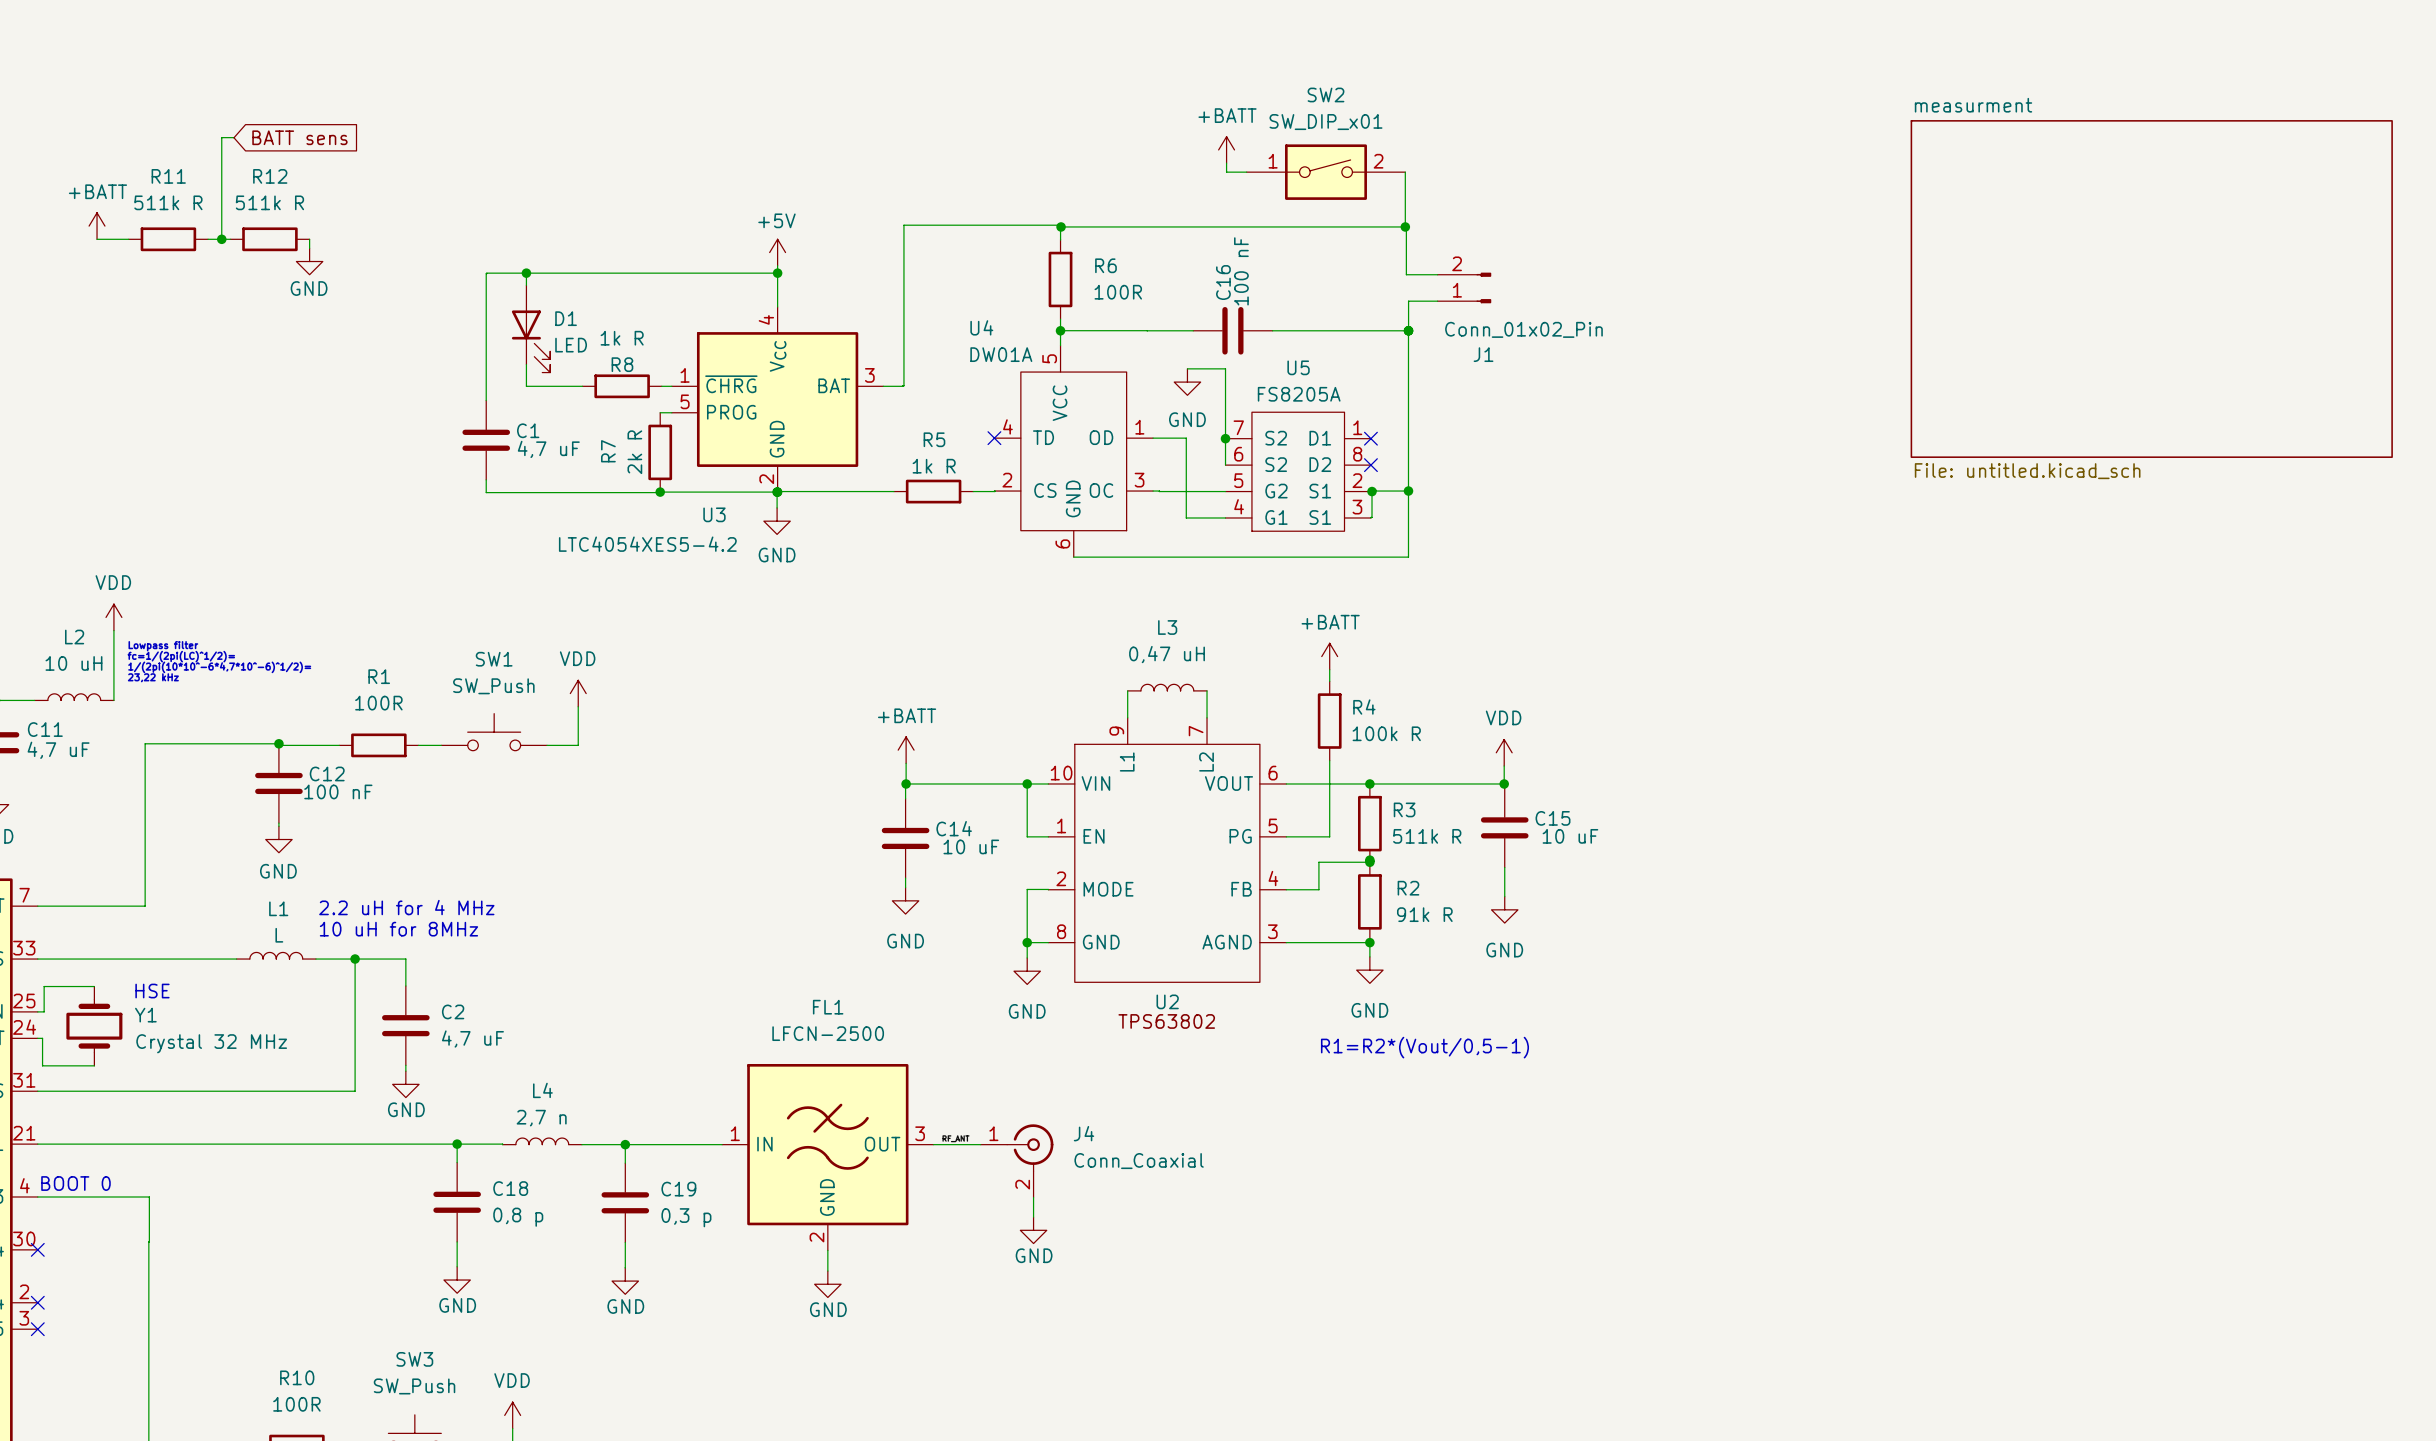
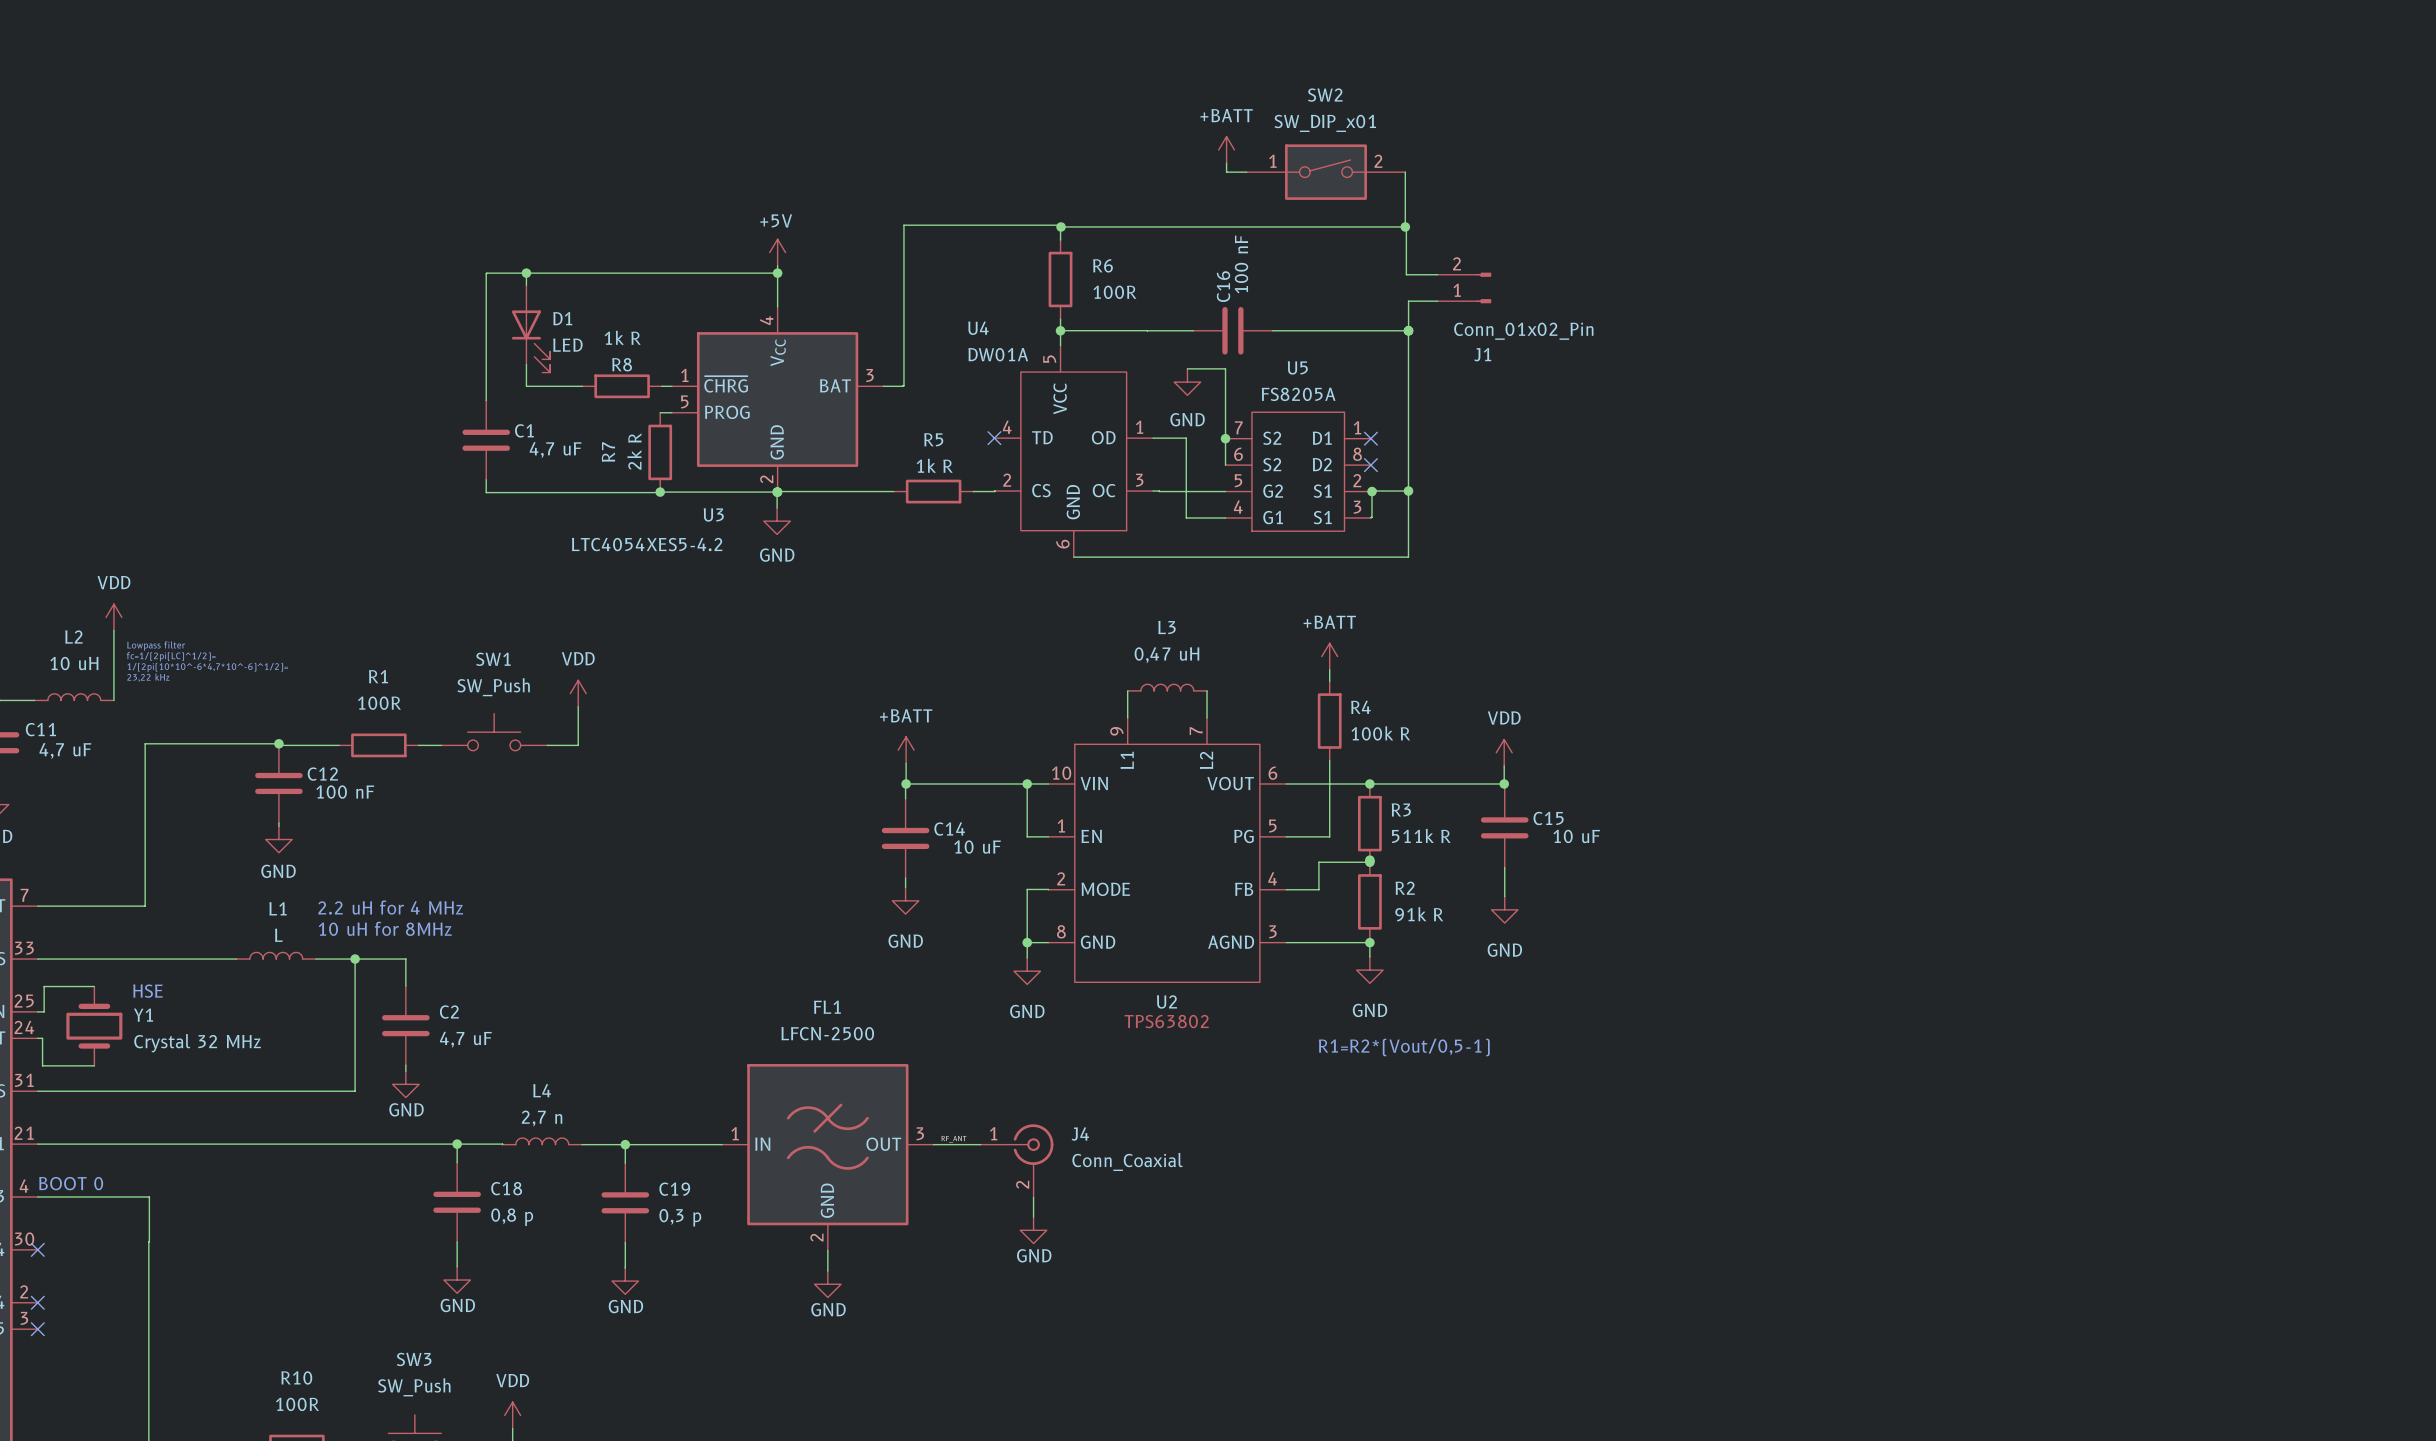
wire: (233, 137) (221, 137) (221, 239) -> none
global label: BATT sens (299, 137) -> none
power symbol: +BATT (97, 226) -> none
wire: (97, 239) (128, 239) -> none
R11: 511k R (168, 239) -> none
wire: (208, 239) (230, 239) -> none
junction: (221, 239) -> none
R12: 511k R (269, 239) -> none
wire: (309, 239) (309, 248) -> none
power symbol: GND (309, 261) -> none
sheet measurment: File: untitled.kicad_sch (2151, 289) -> none

